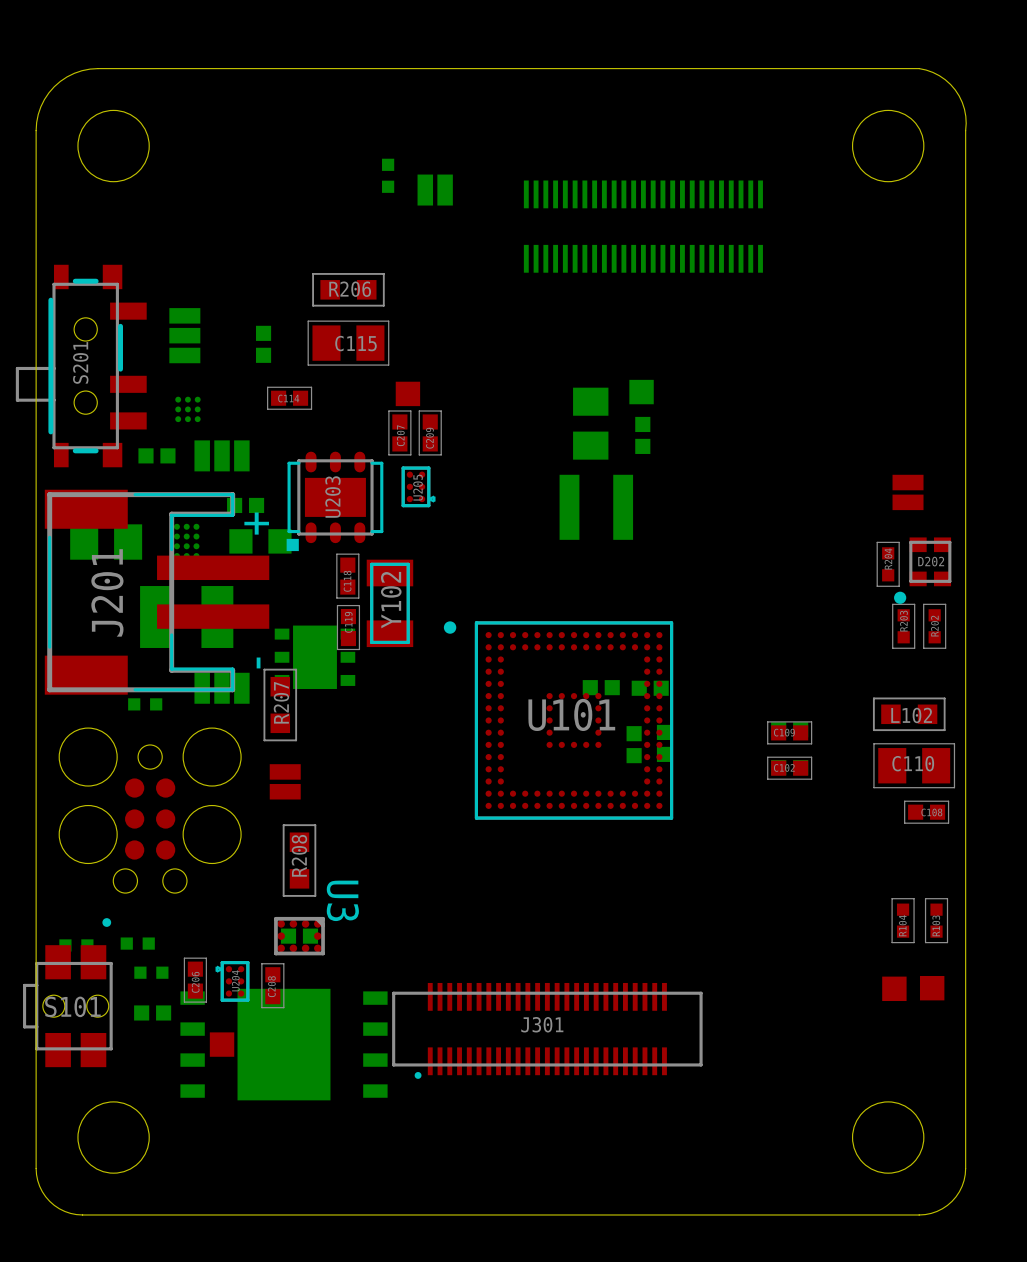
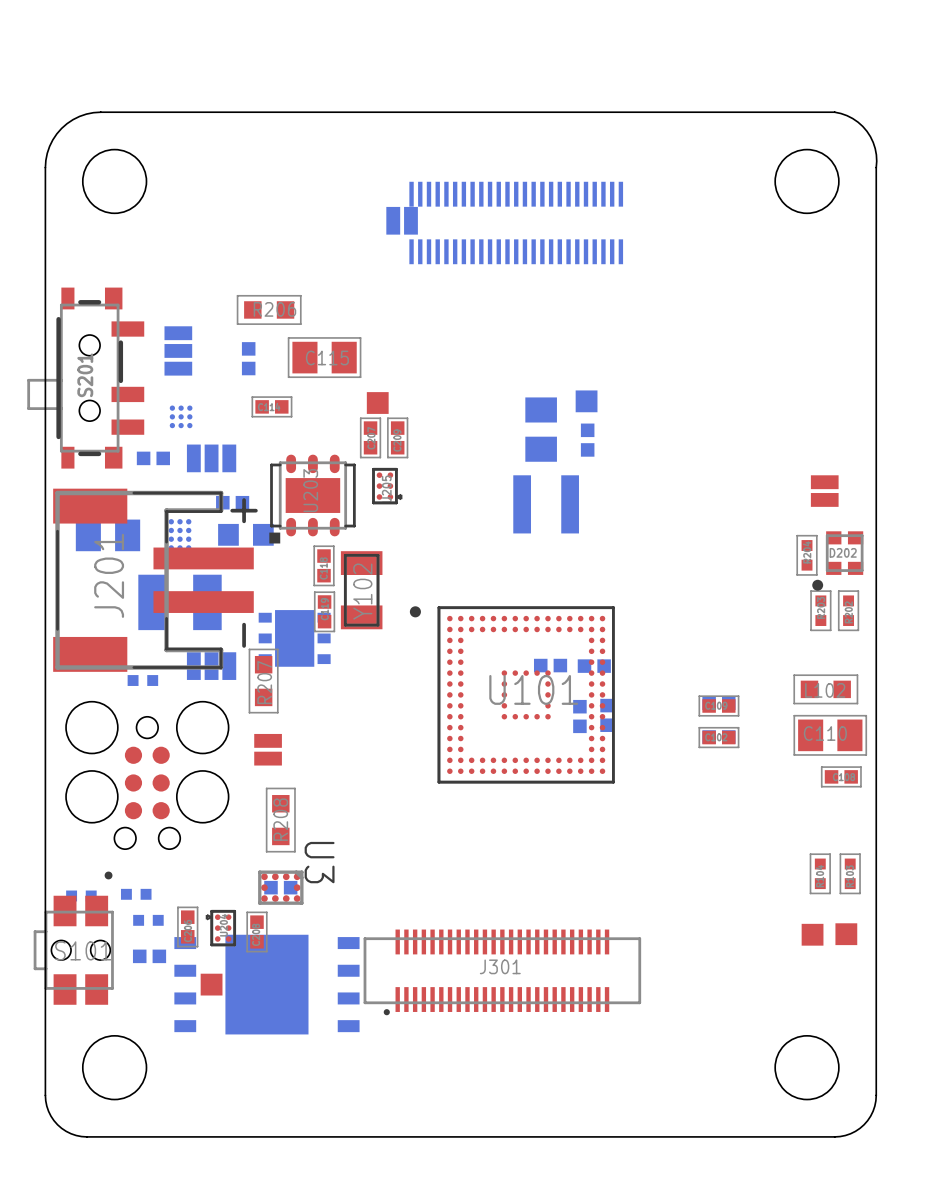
part: (388, 175) -> none
part position: (643, 226) -> (516, 222)
R206 position: (348, 289) -> (269, 309)

